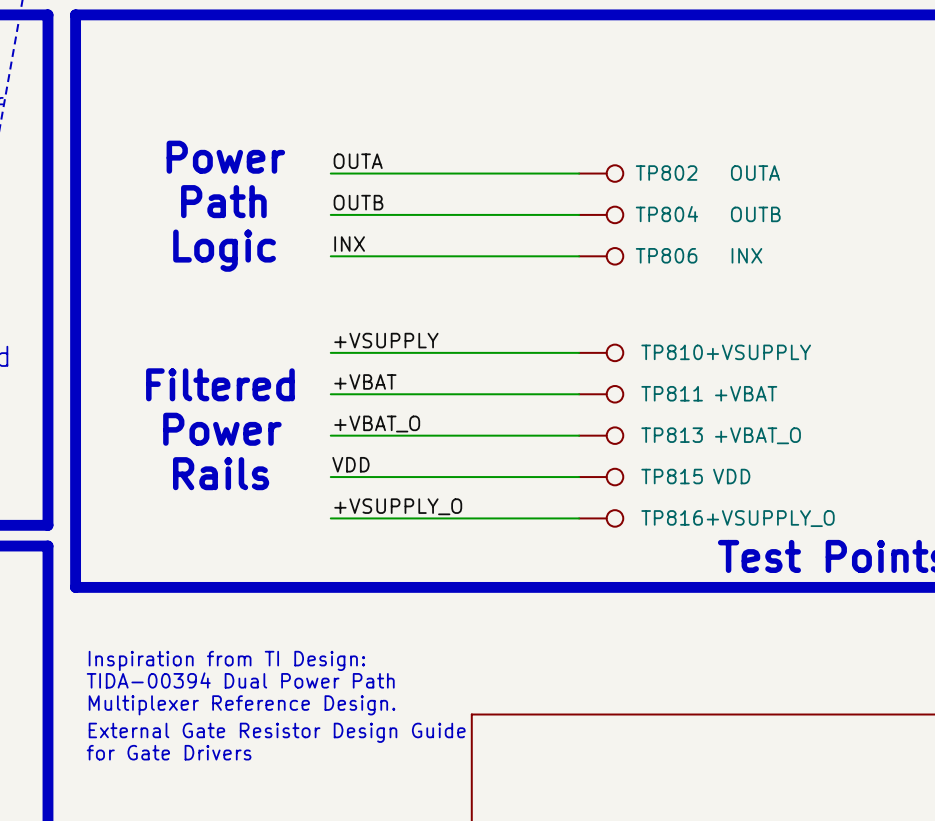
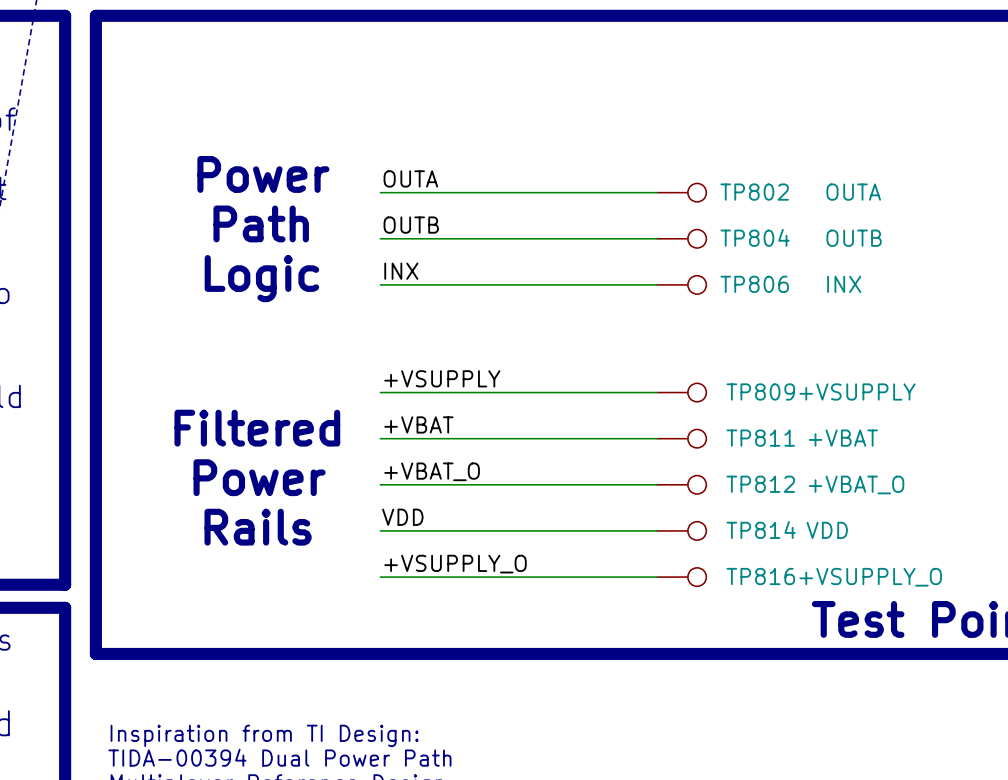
TP810 name: TP810 (672, 352) -> TP809 (760, 391)
TP813 name: TP813 (672, 435) -> TP812 (760, 484)
TP815 name: TP815 (672, 476) -> TP814 (761, 530)

